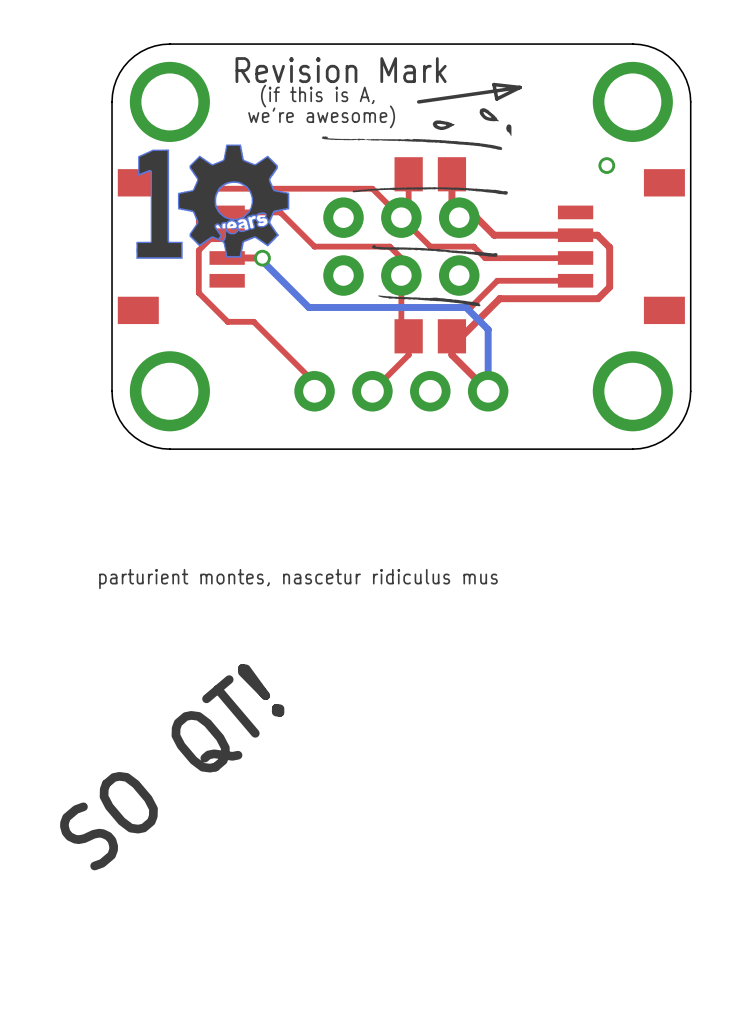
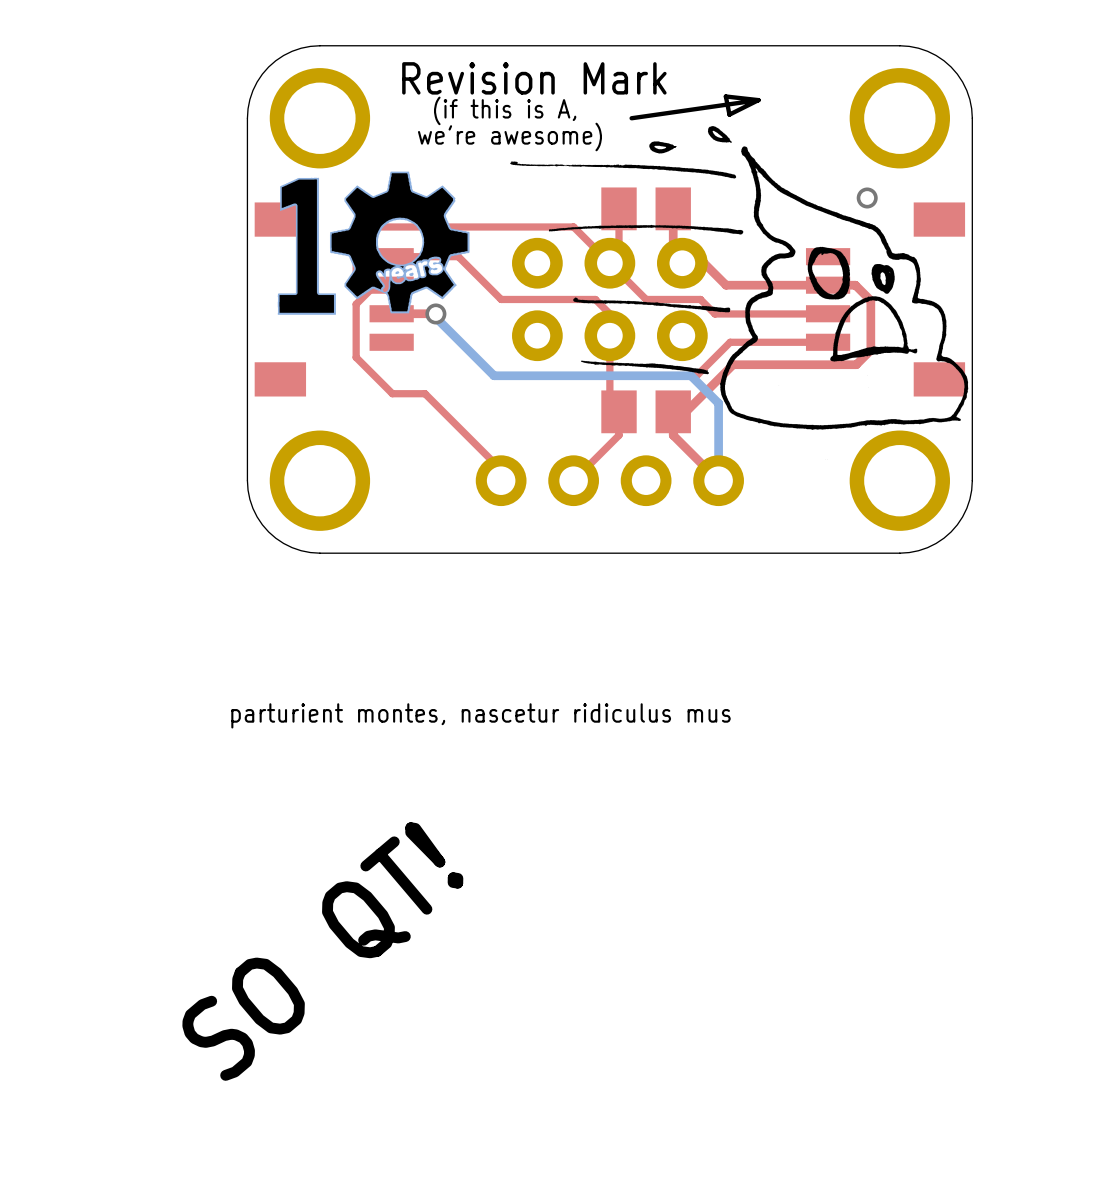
drawing: none -> [720, 150, 969, 460]

